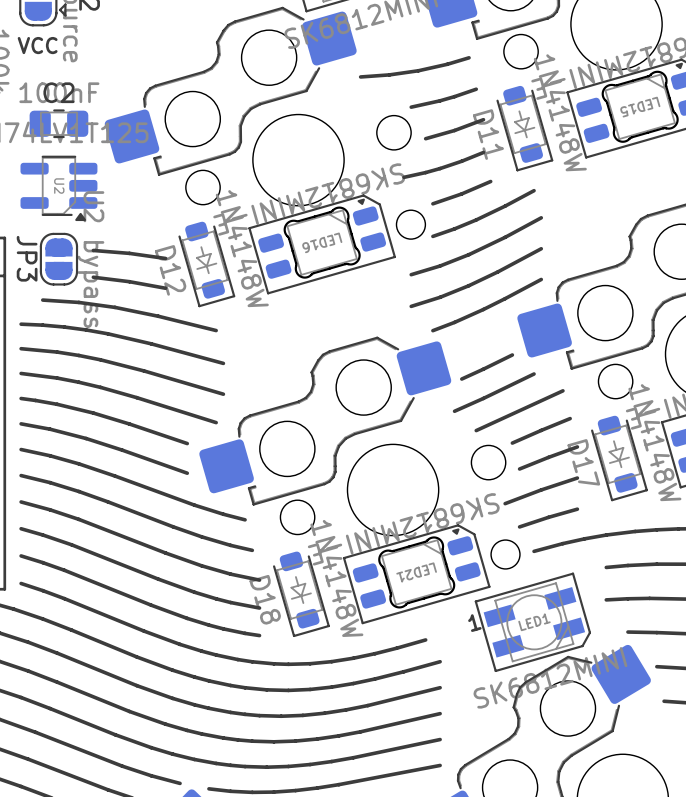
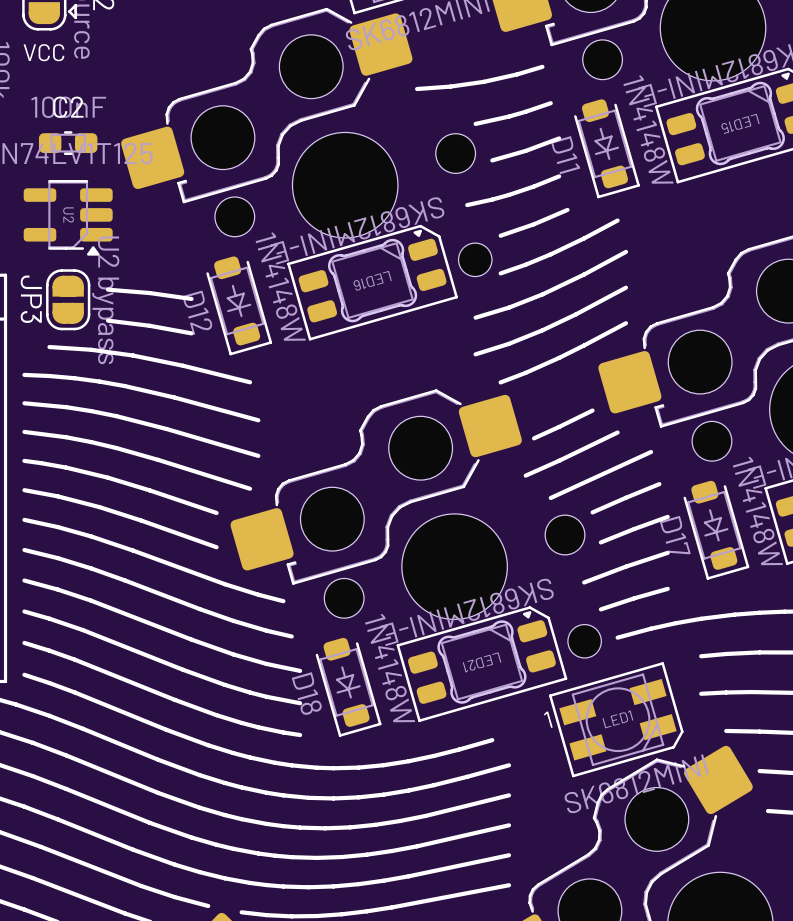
C2 footprint: [29, 109, 89, 139] -> [38, 131, 98, 156]

